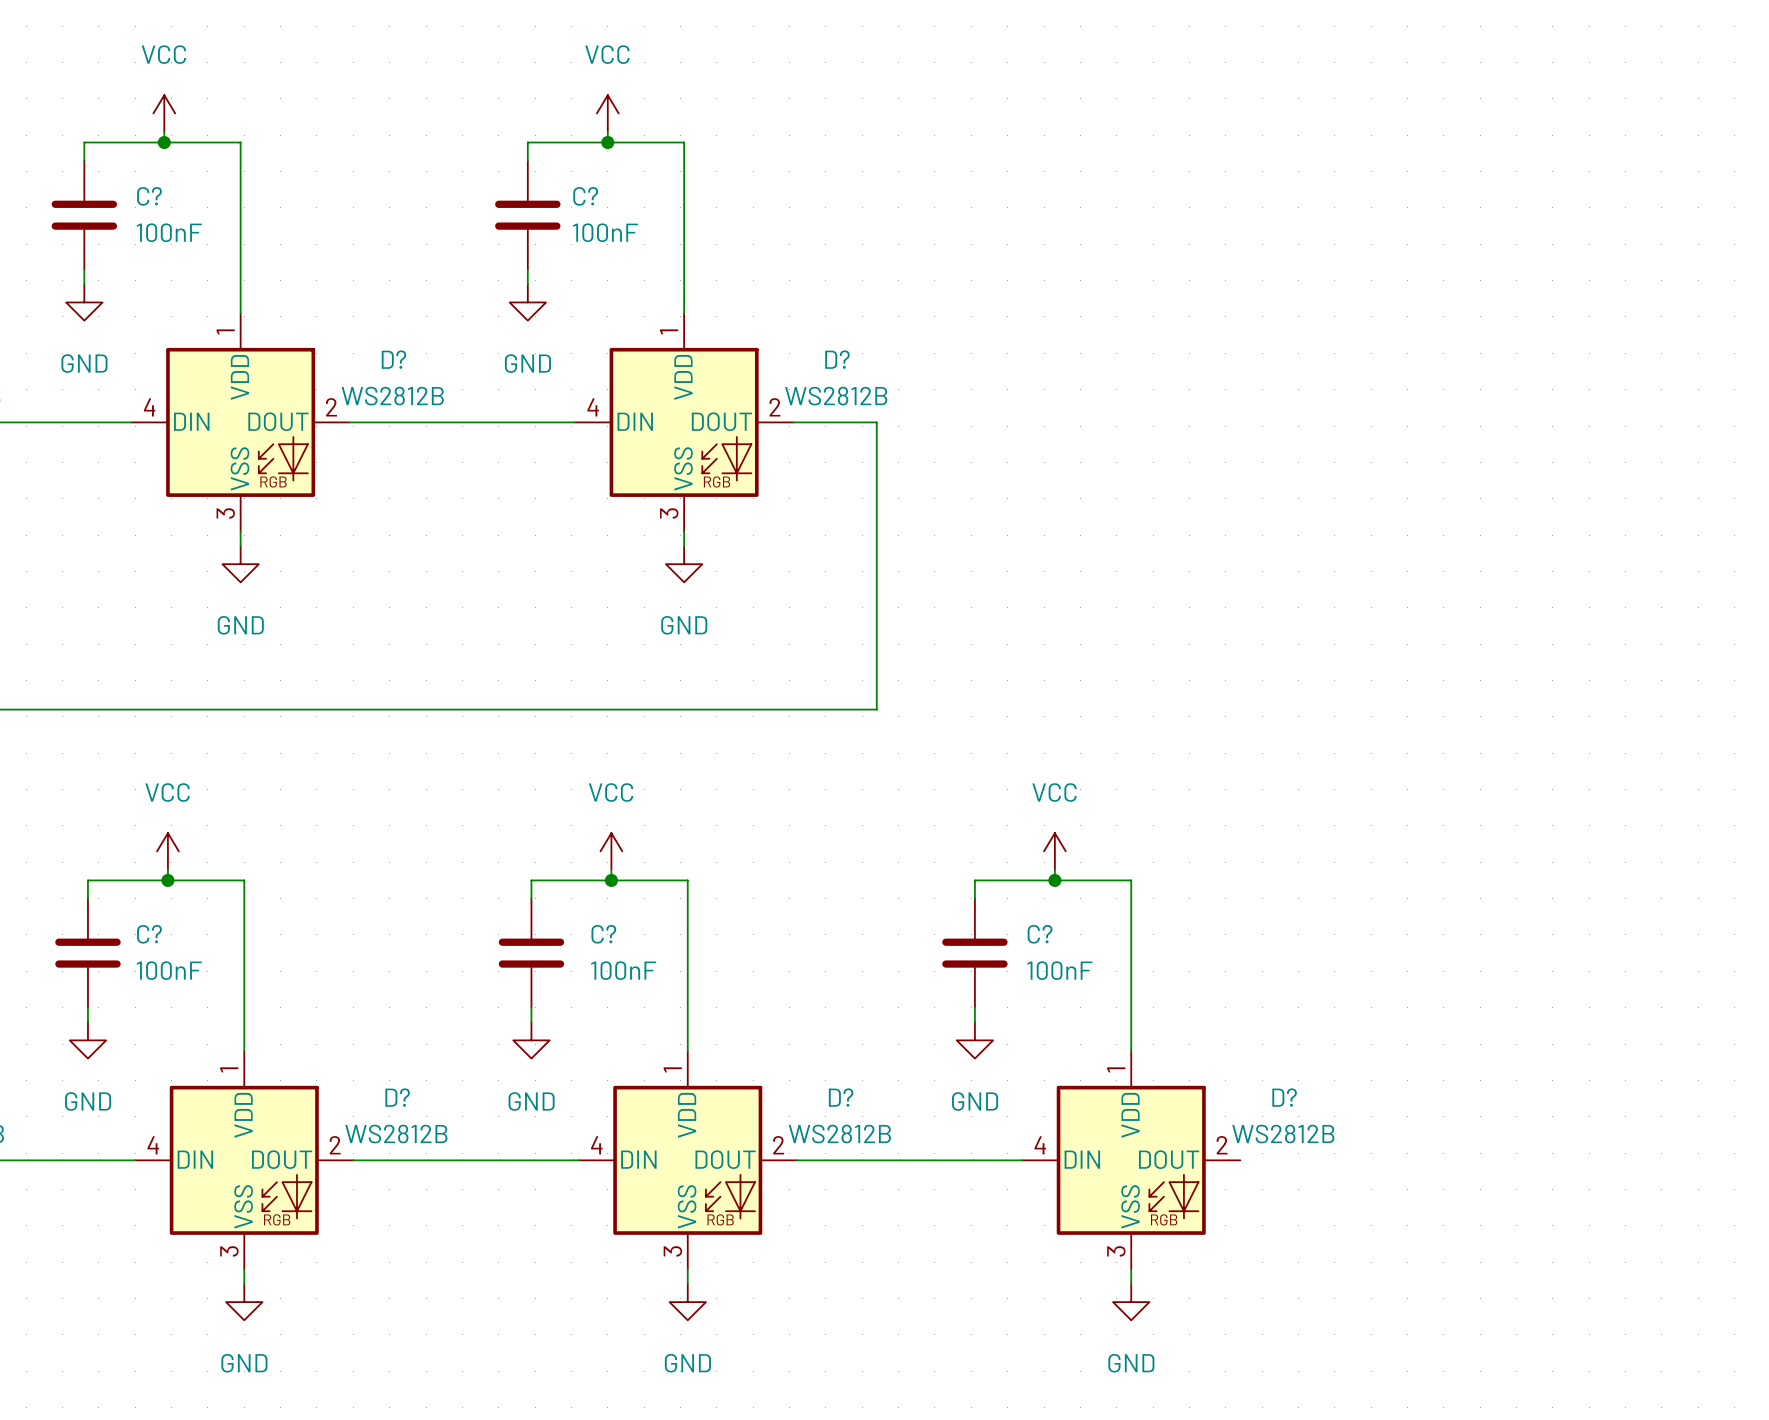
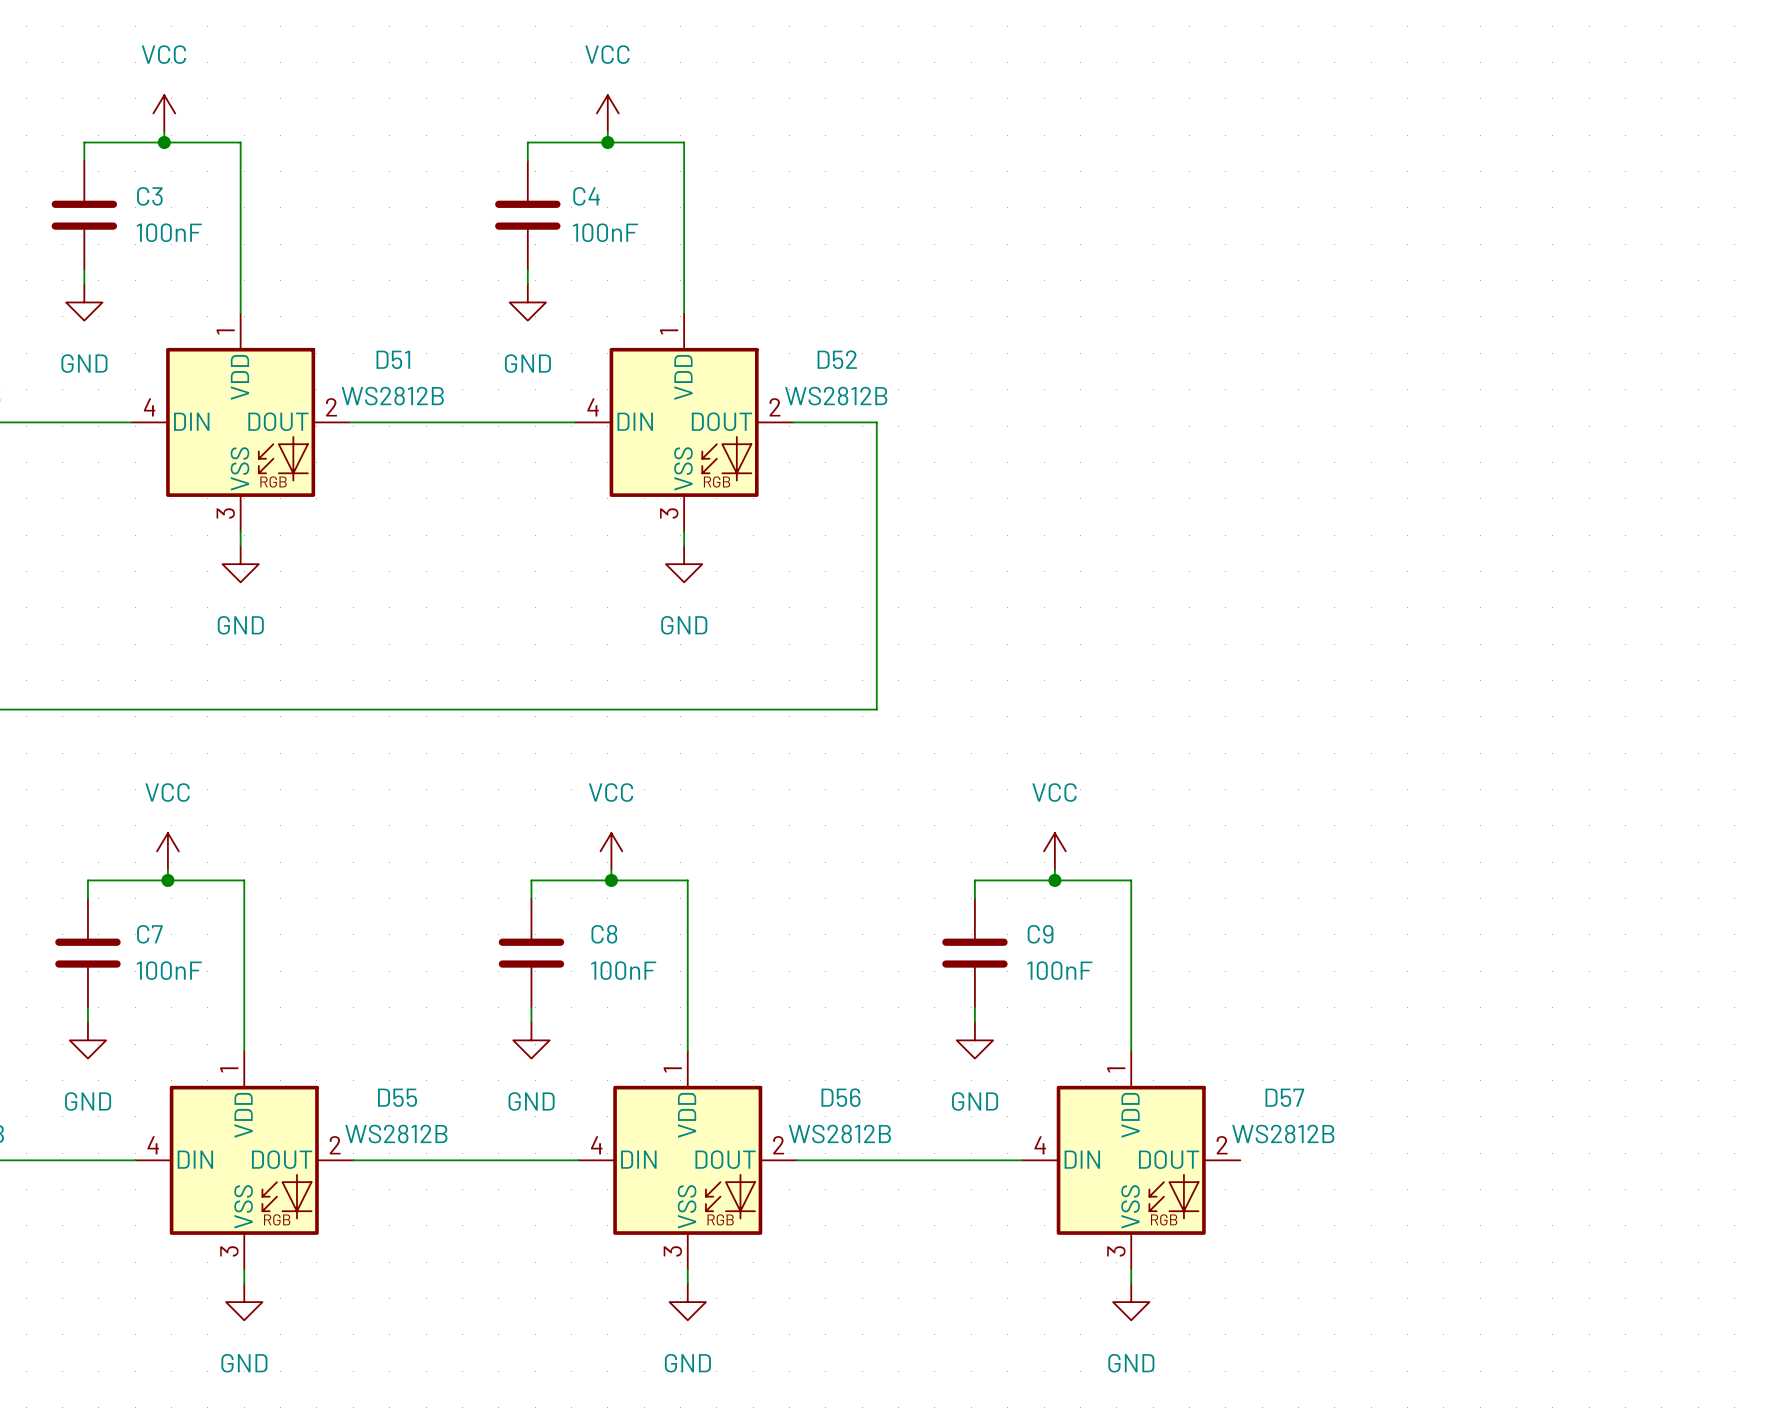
C? name: C? (149, 196) -> C3 (149, 196)
C? name: C? (585, 196) -> C4 (586, 196)
D? name: D? (393, 359) -> D51 (393, 359)
D? name: D? (837, 359) -> D52 (837, 359)
C? name: C? (149, 934) -> C7 (149, 934)
C? name: C? (603, 934) -> C8 (604, 934)
C? name: C? (1040, 934) -> C9 (1040, 934)
D? name: D? (397, 1097) -> D55 (397, 1097)
D? name: D? (841, 1097) -> D56 (841, 1097)
D? name: D? (1284, 1097) -> D57 (1284, 1097)

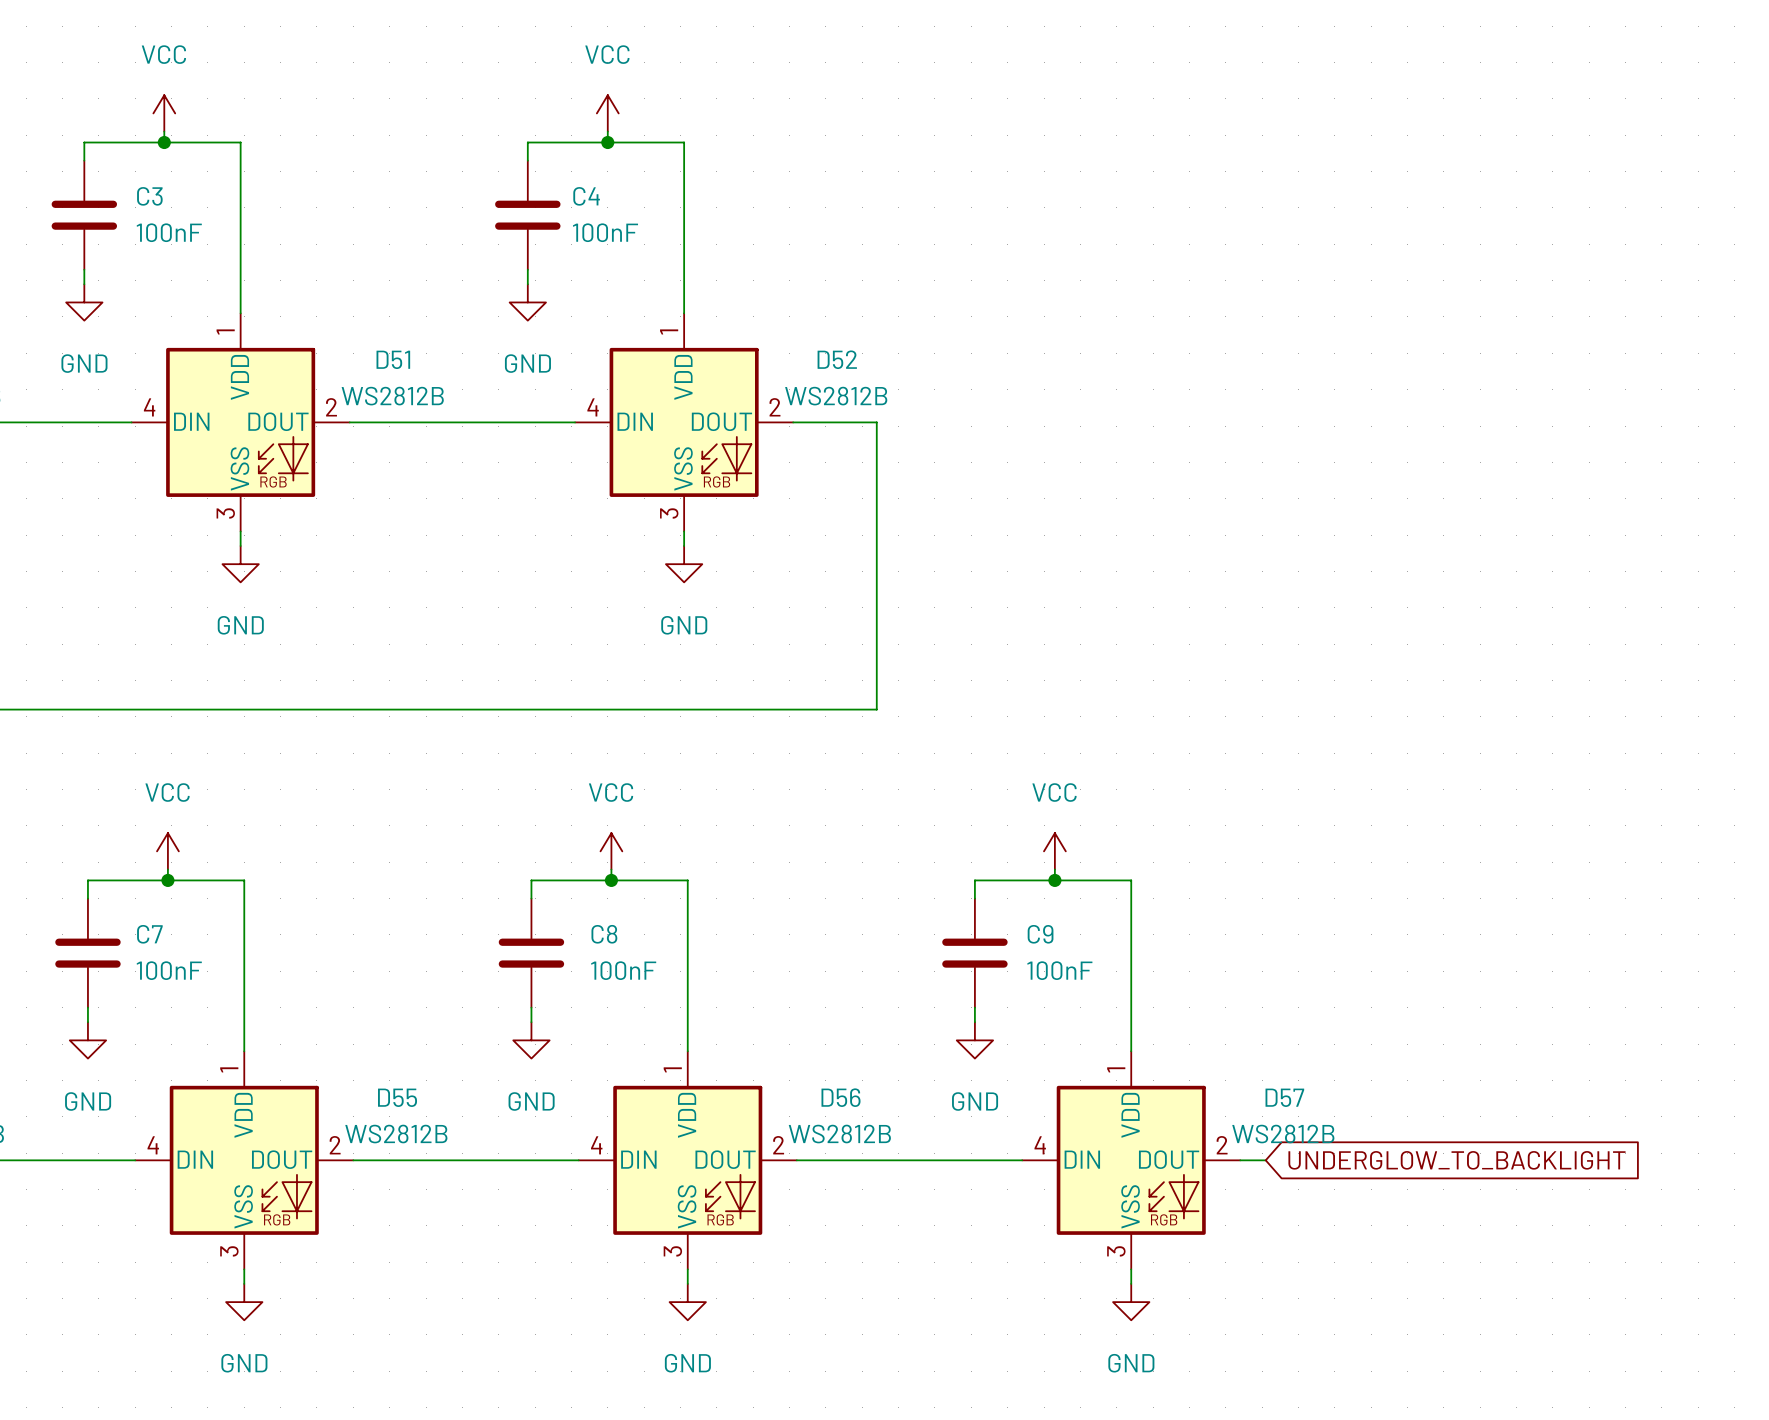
wire: none -> (1240, 1160) (1265, 1160)
global label: none -> UNDERGLOW_TO_BACKLIGHT (1456, 1160)

